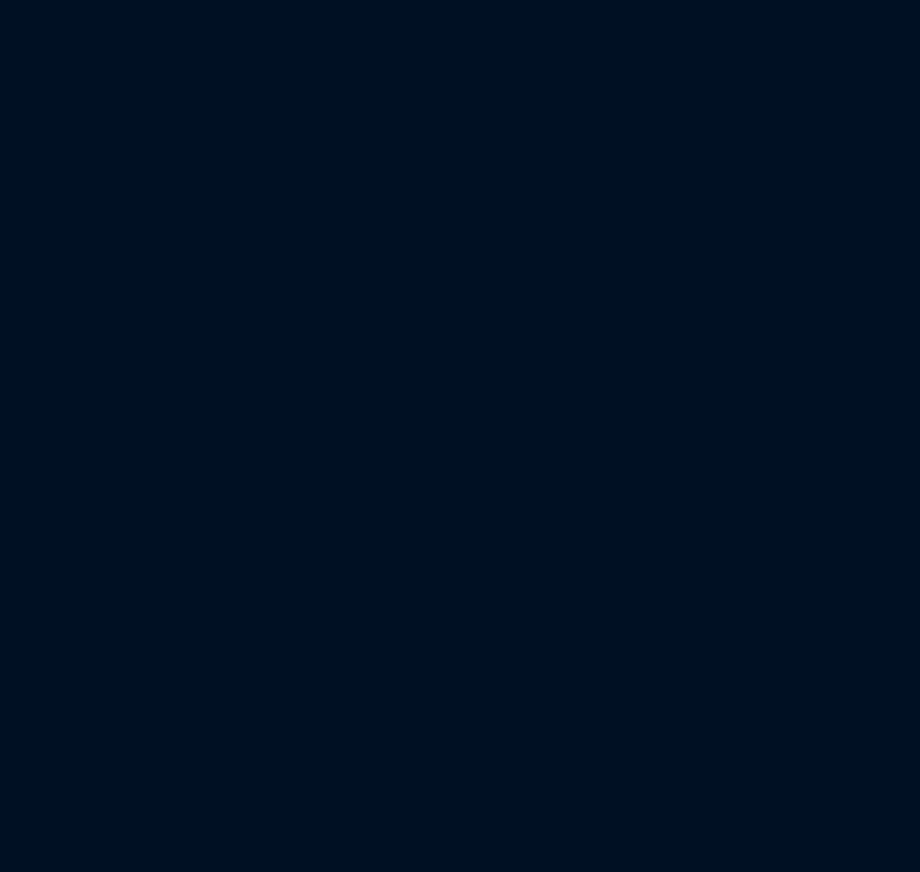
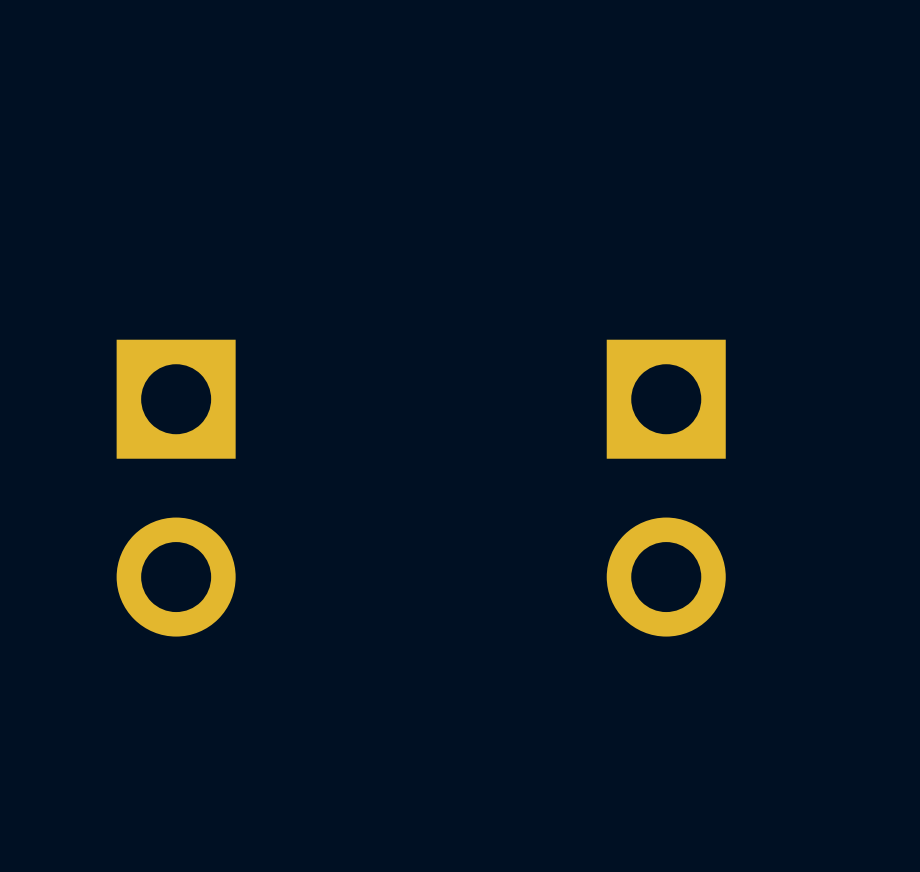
part: none -> (176, 488)
part: none -> (666, 488)

